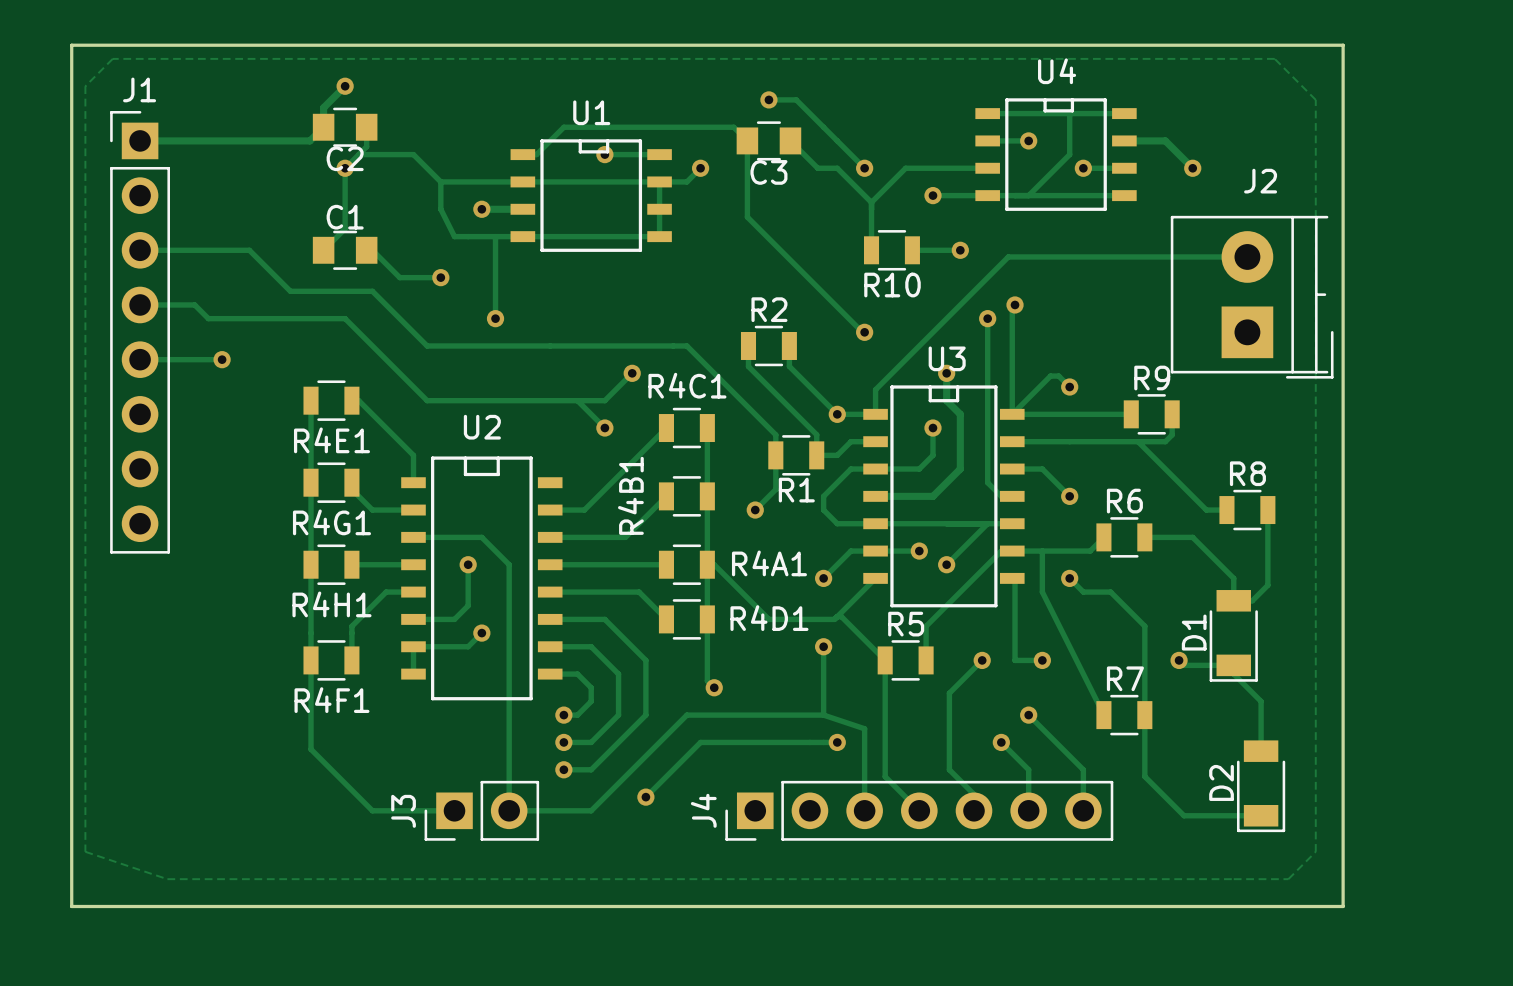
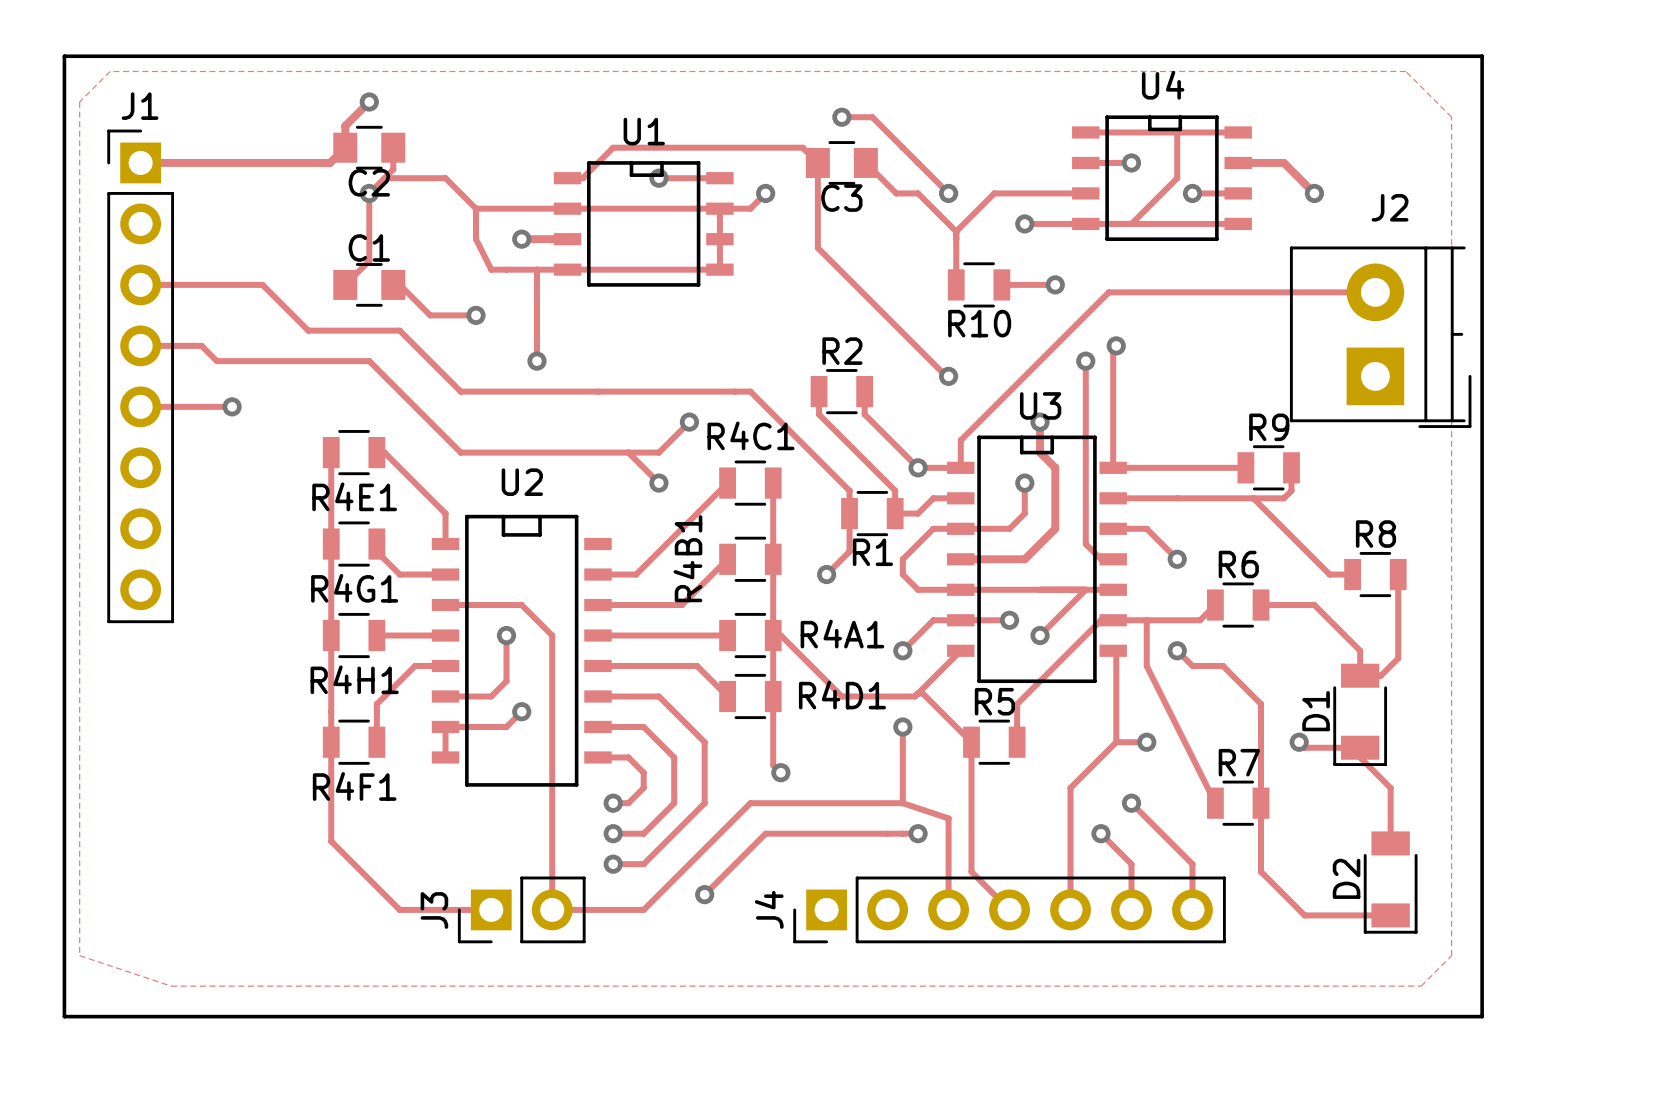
track: (1069, 387) (1058, 376) (1050, 376) (1012, 414) -> none
via: (1069, 387) -> none
track: (982, 660) (949, 693) (949, 769) (974, 794) -> (1116, 742) (1070, 787) (1070, 891)
via: (982, 660) -> none

